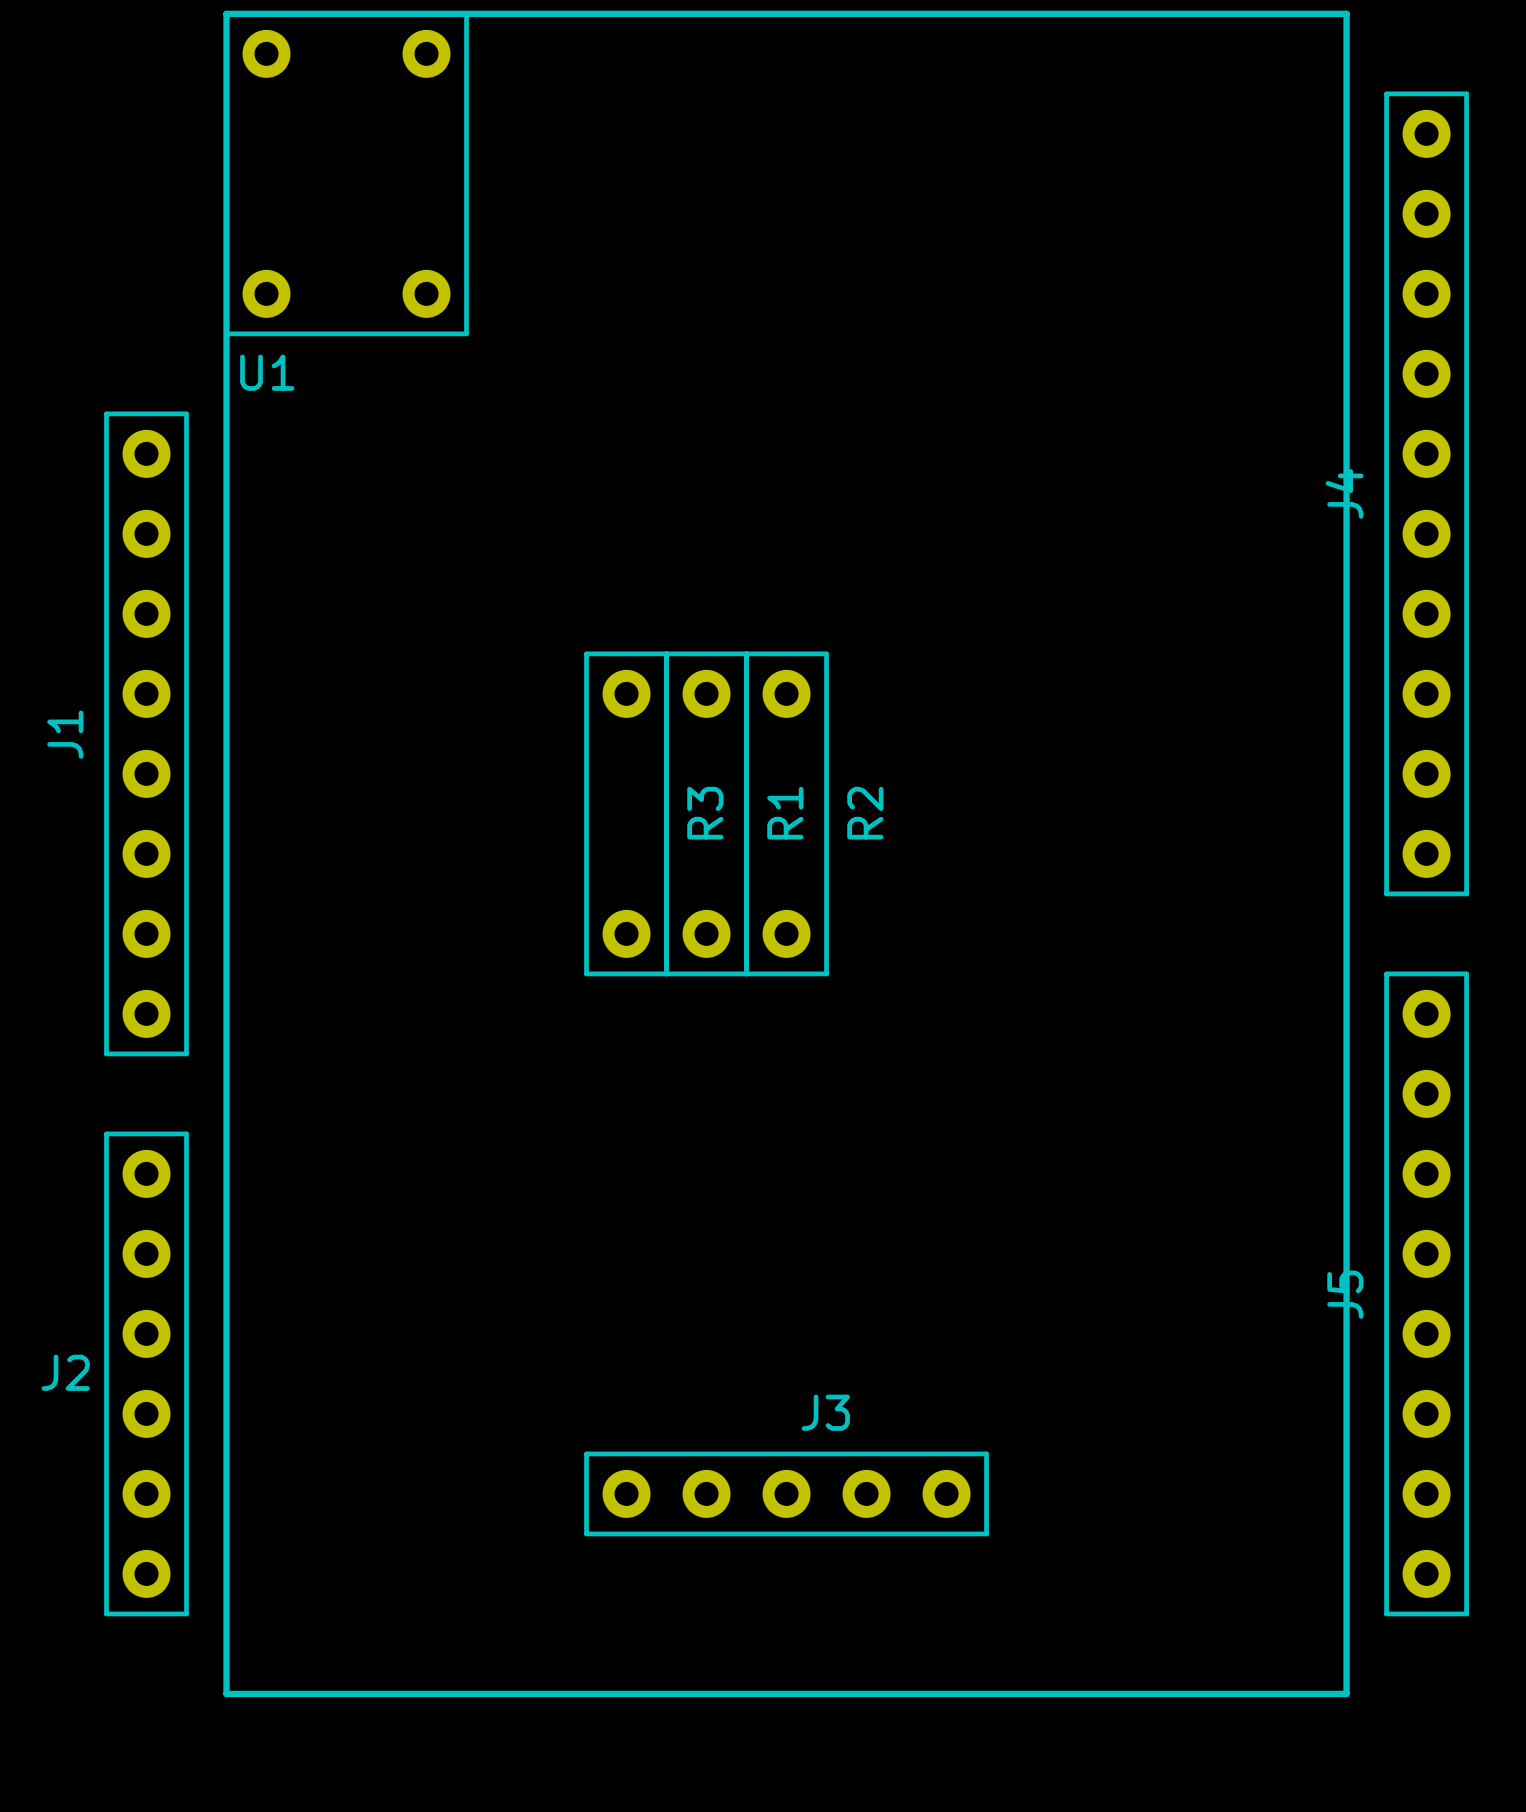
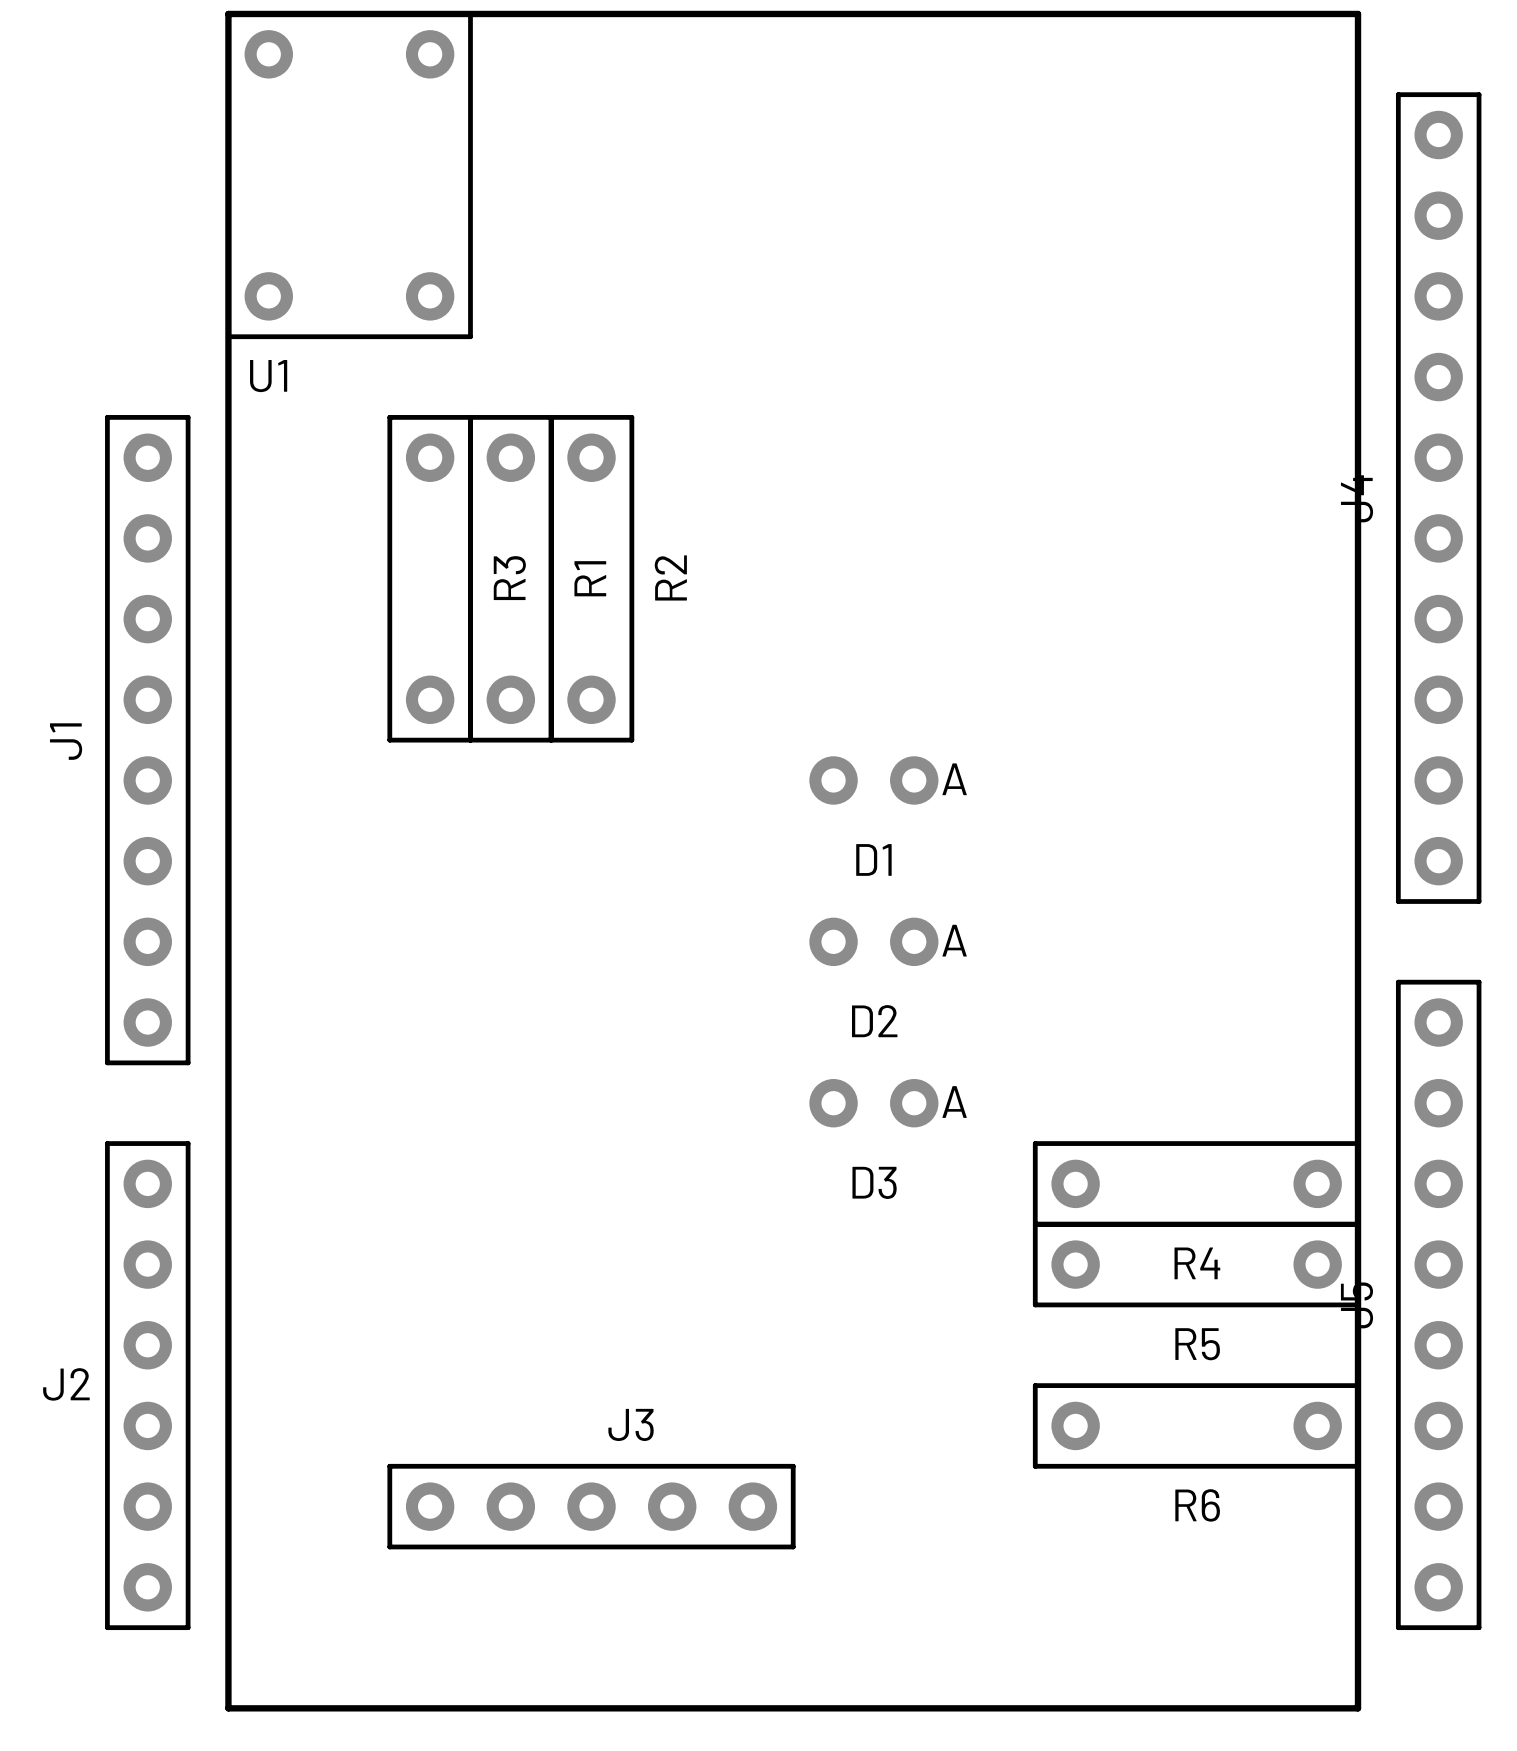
D1: none -> (873, 780)
R3 position: (626, 813) -> (430, 578)
R1 position: (706, 813) -> (510, 578)
R2 position: (786, 813) -> (591, 578)
D2: none -> (873, 941)
D3: none -> (873, 1103)
R4: none -> (1196, 1183)
R5: none -> (1196, 1264)
R6: none -> (1196, 1425)
J3 position: (786, 1493) -> (591, 1506)

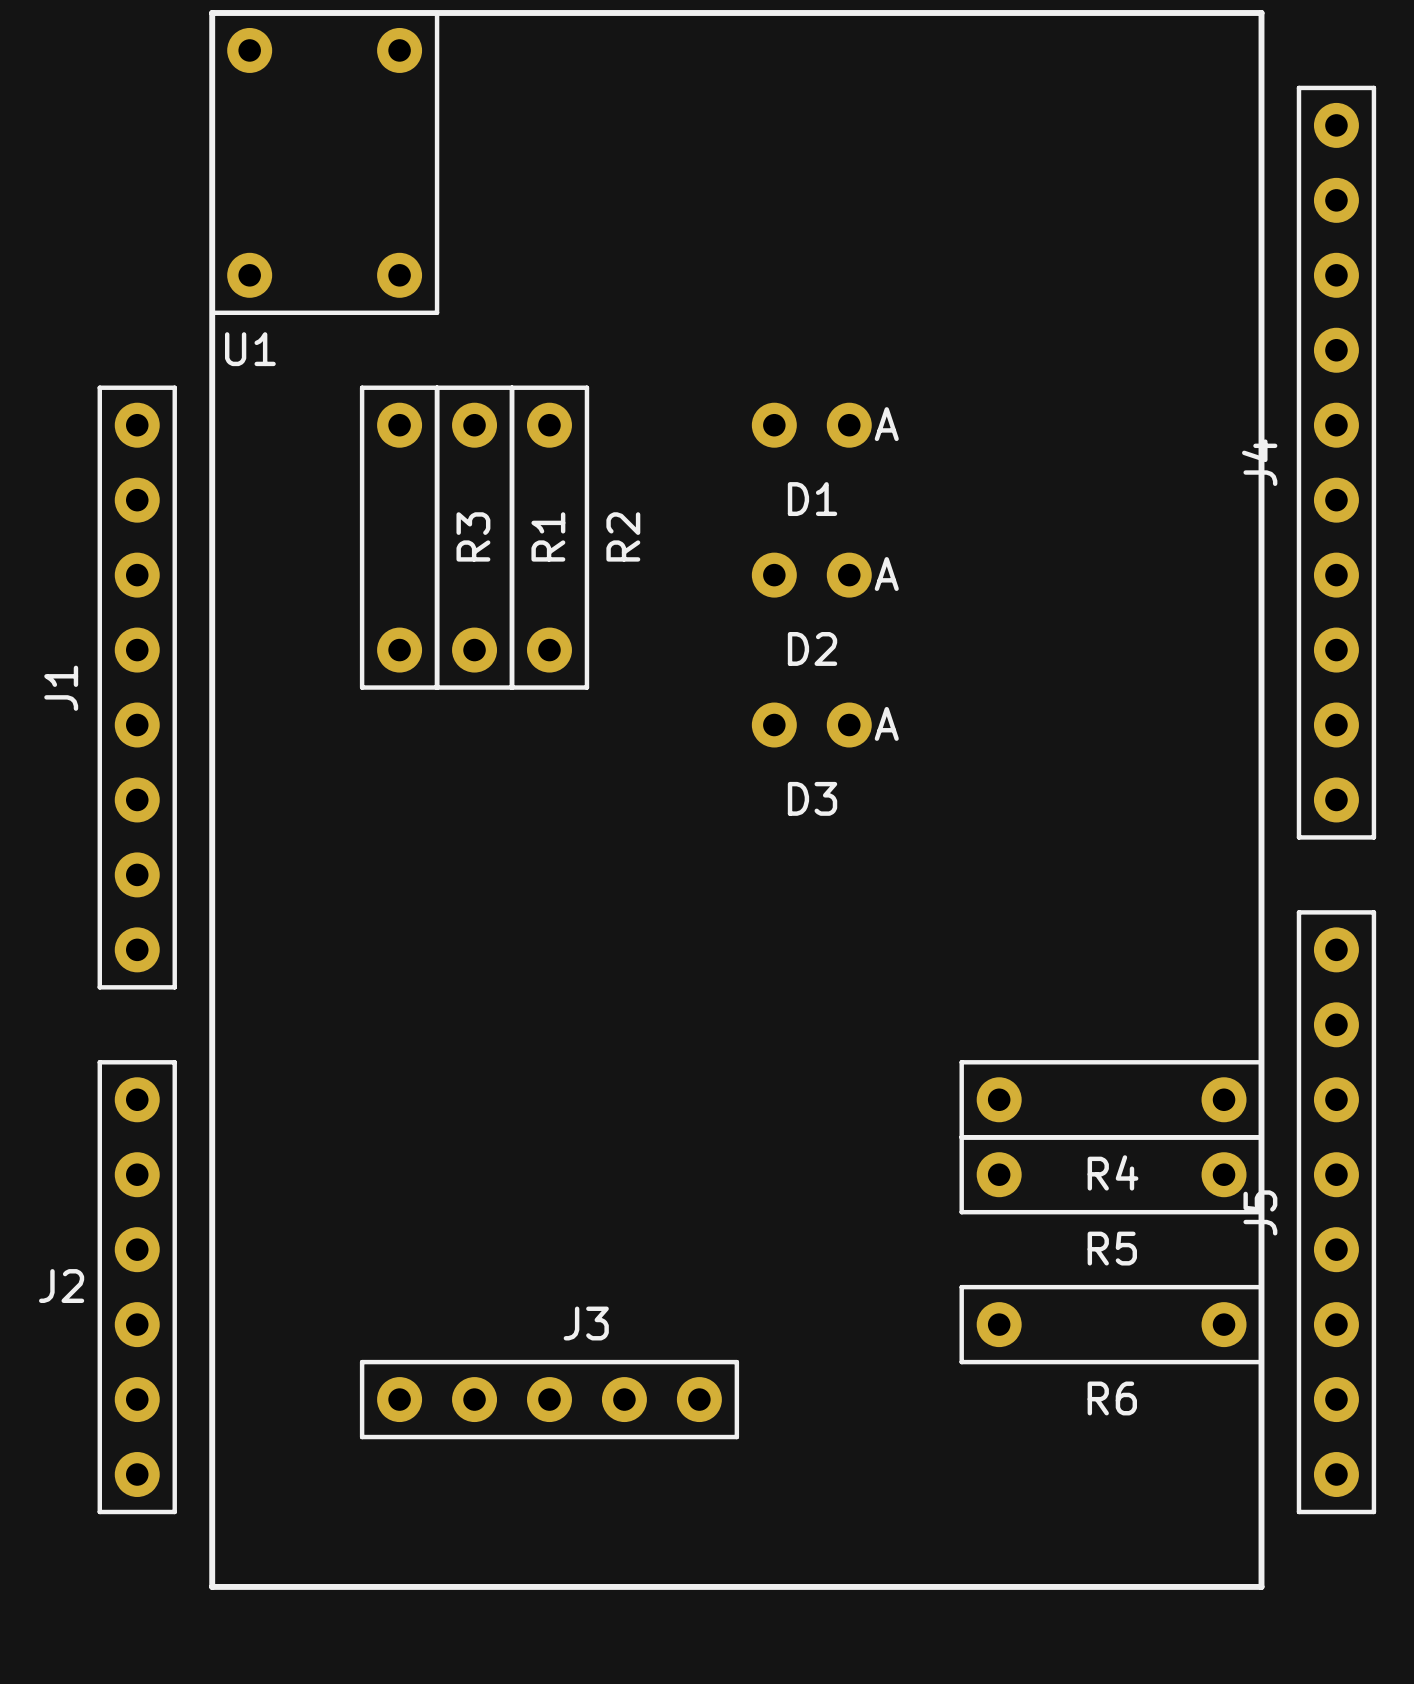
D1: none -> (811, 425)
D1 name: D1 (873, 859) -> D3 (812, 798)
D2 position: (873, 941) -> (811, 575)
D3: (873, 1103) -> none

